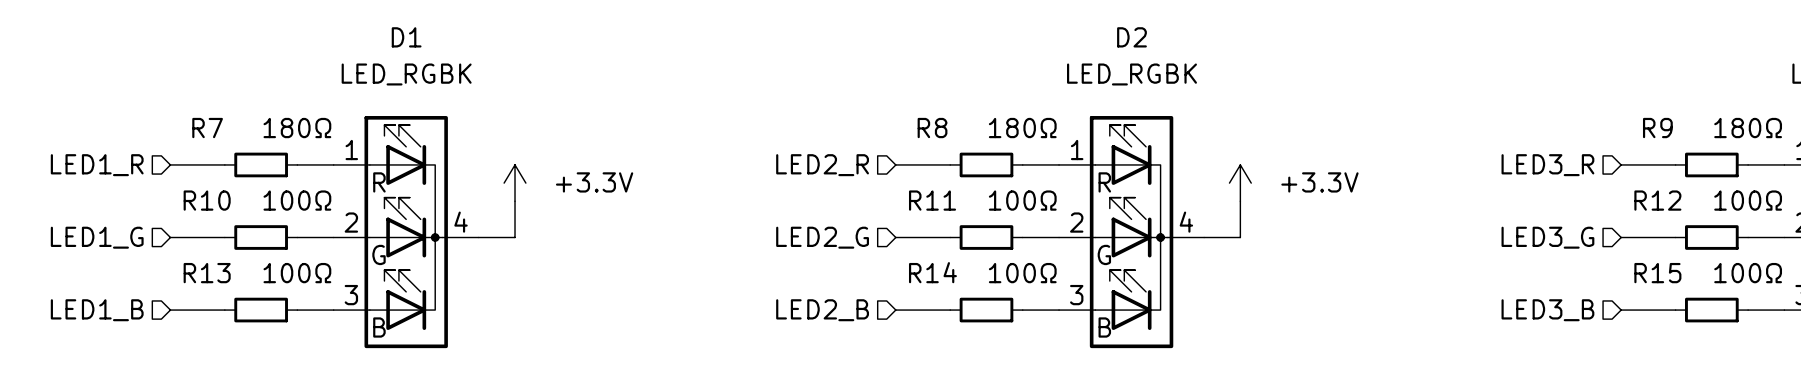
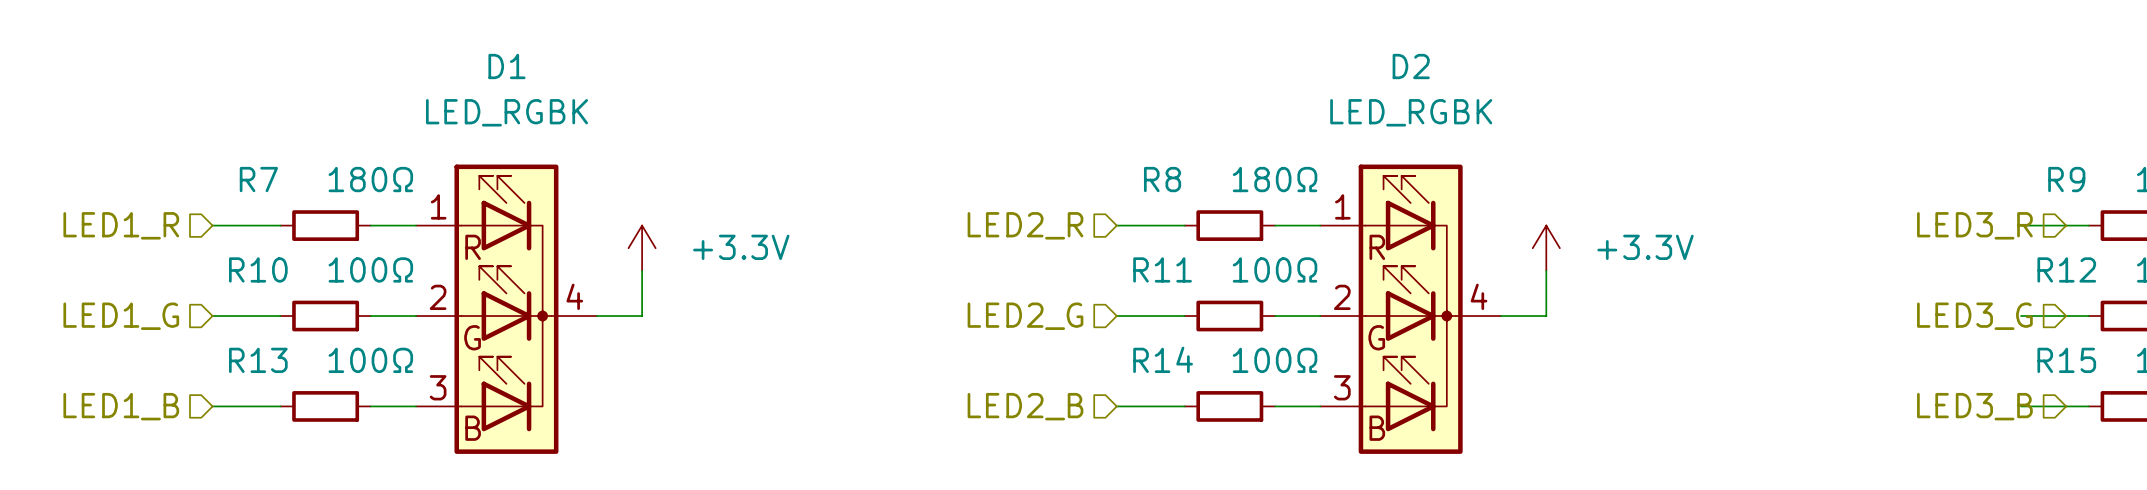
hierarchical label position: LED3_R (1547, 165) -> LED3_R (1974, 225)
hierarchical label position: LED3_G (1547, 237) -> LED3_G (1974, 316)
hierarchical label position: LED3_B (1547, 310) -> LED3_B (1974, 406)

